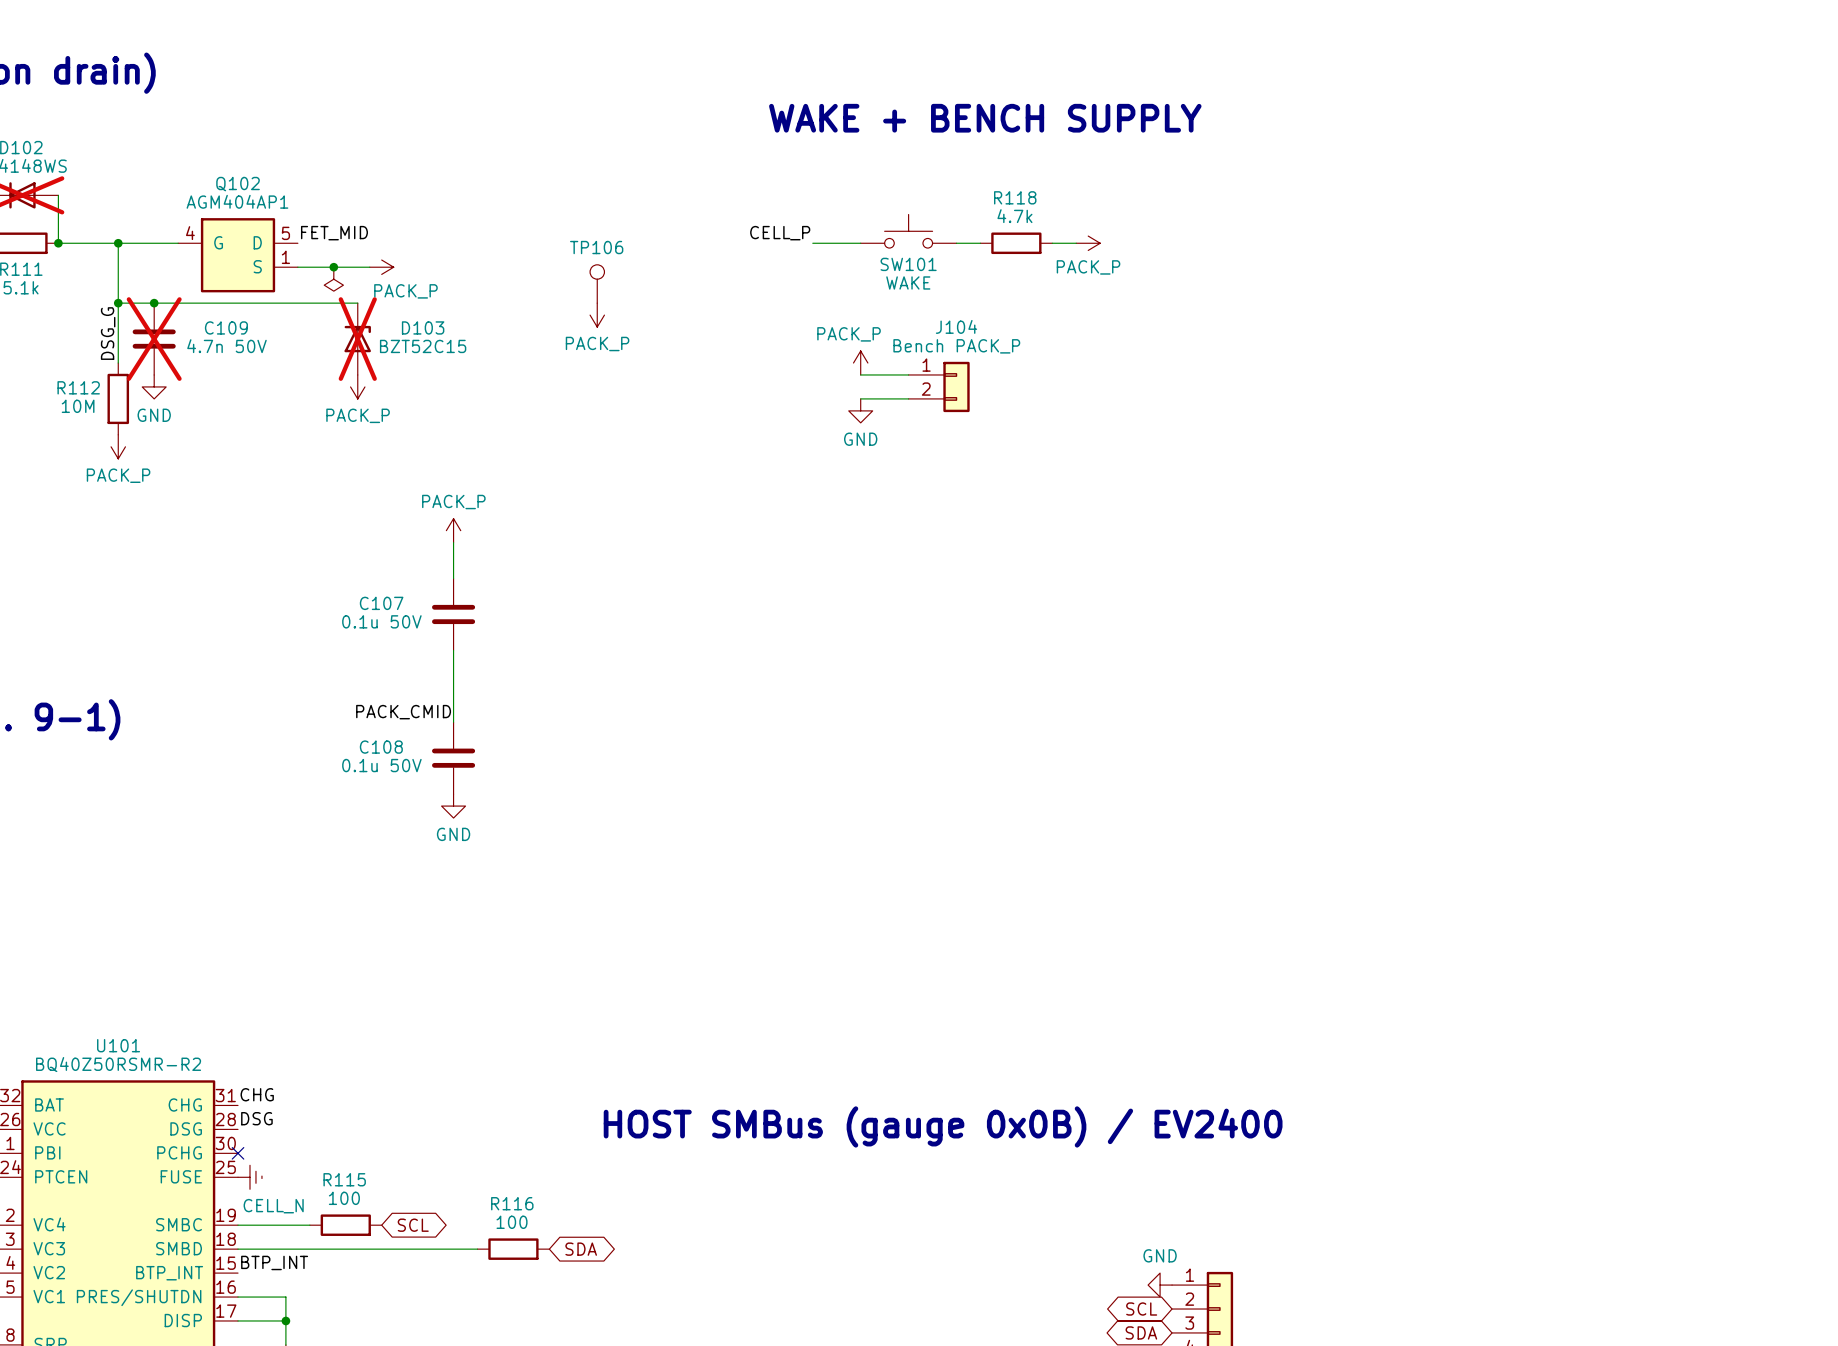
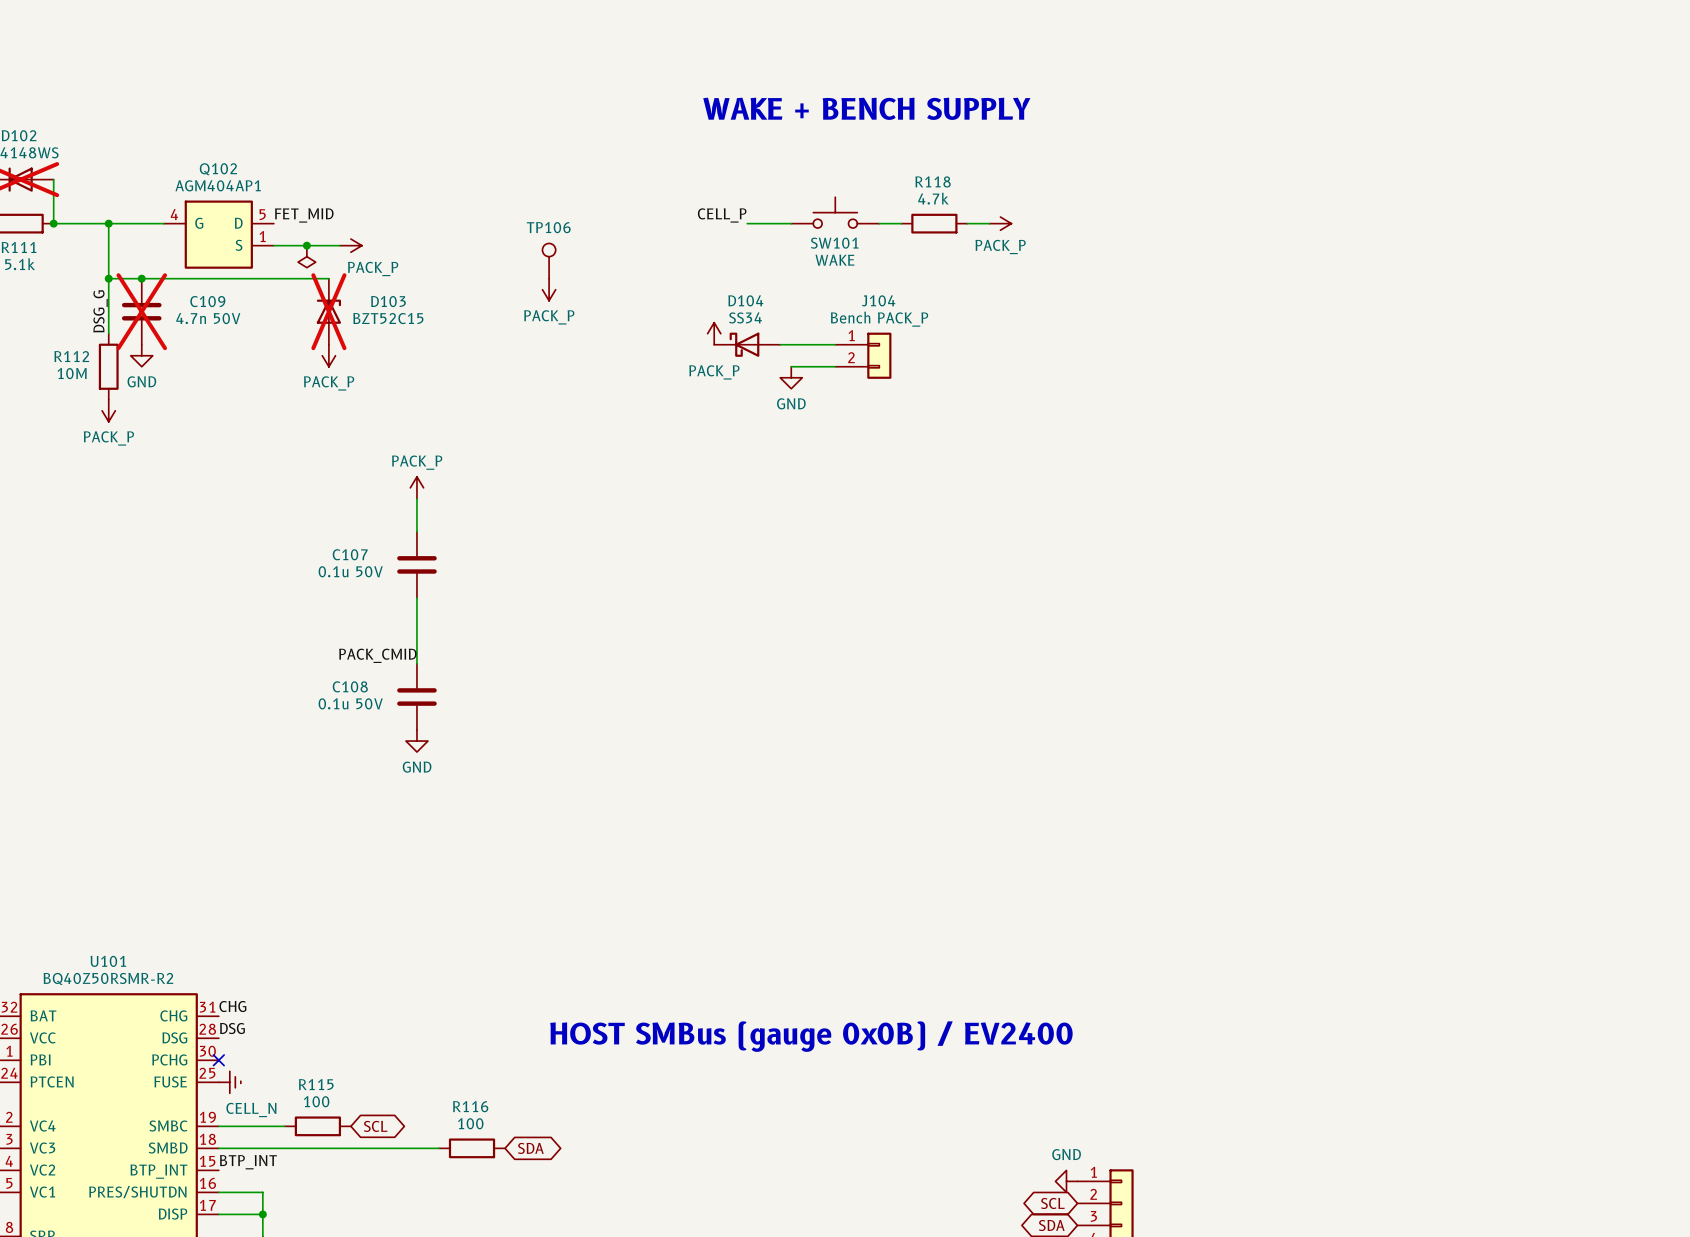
power symbol text position: PACK_P (849, 334) -> PACK_P (714, 372)
power symbol position: PACK_P (860, 363) -> PACK_P (714, 333)
D104: none -> SS34 (747, 344)
wire: none -> (780, 344) (791, 344)

